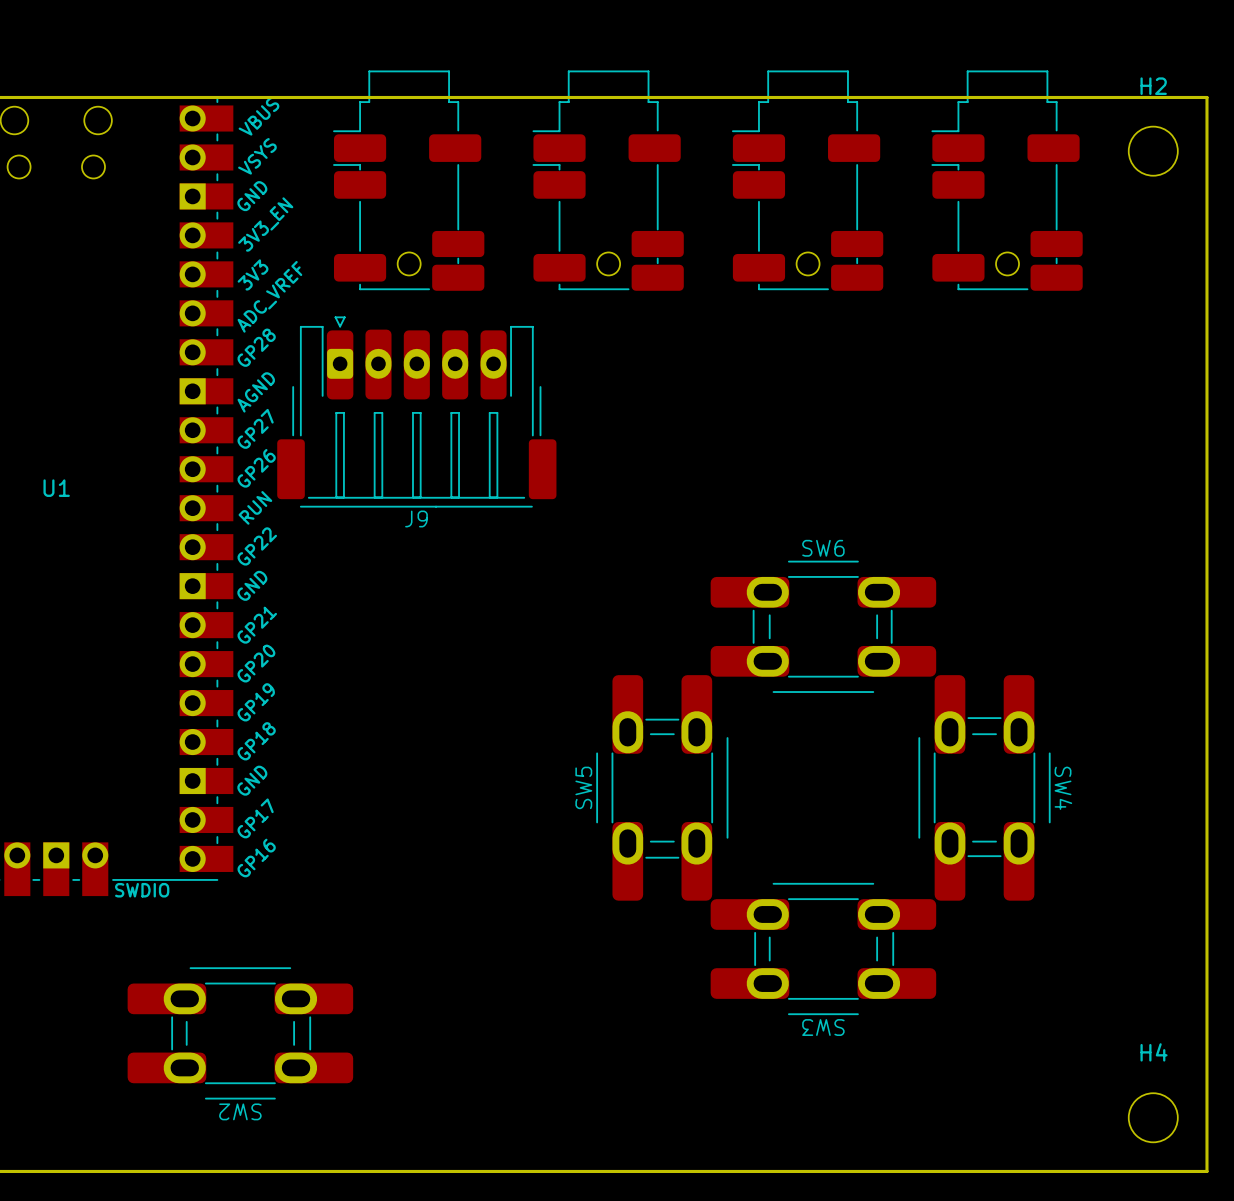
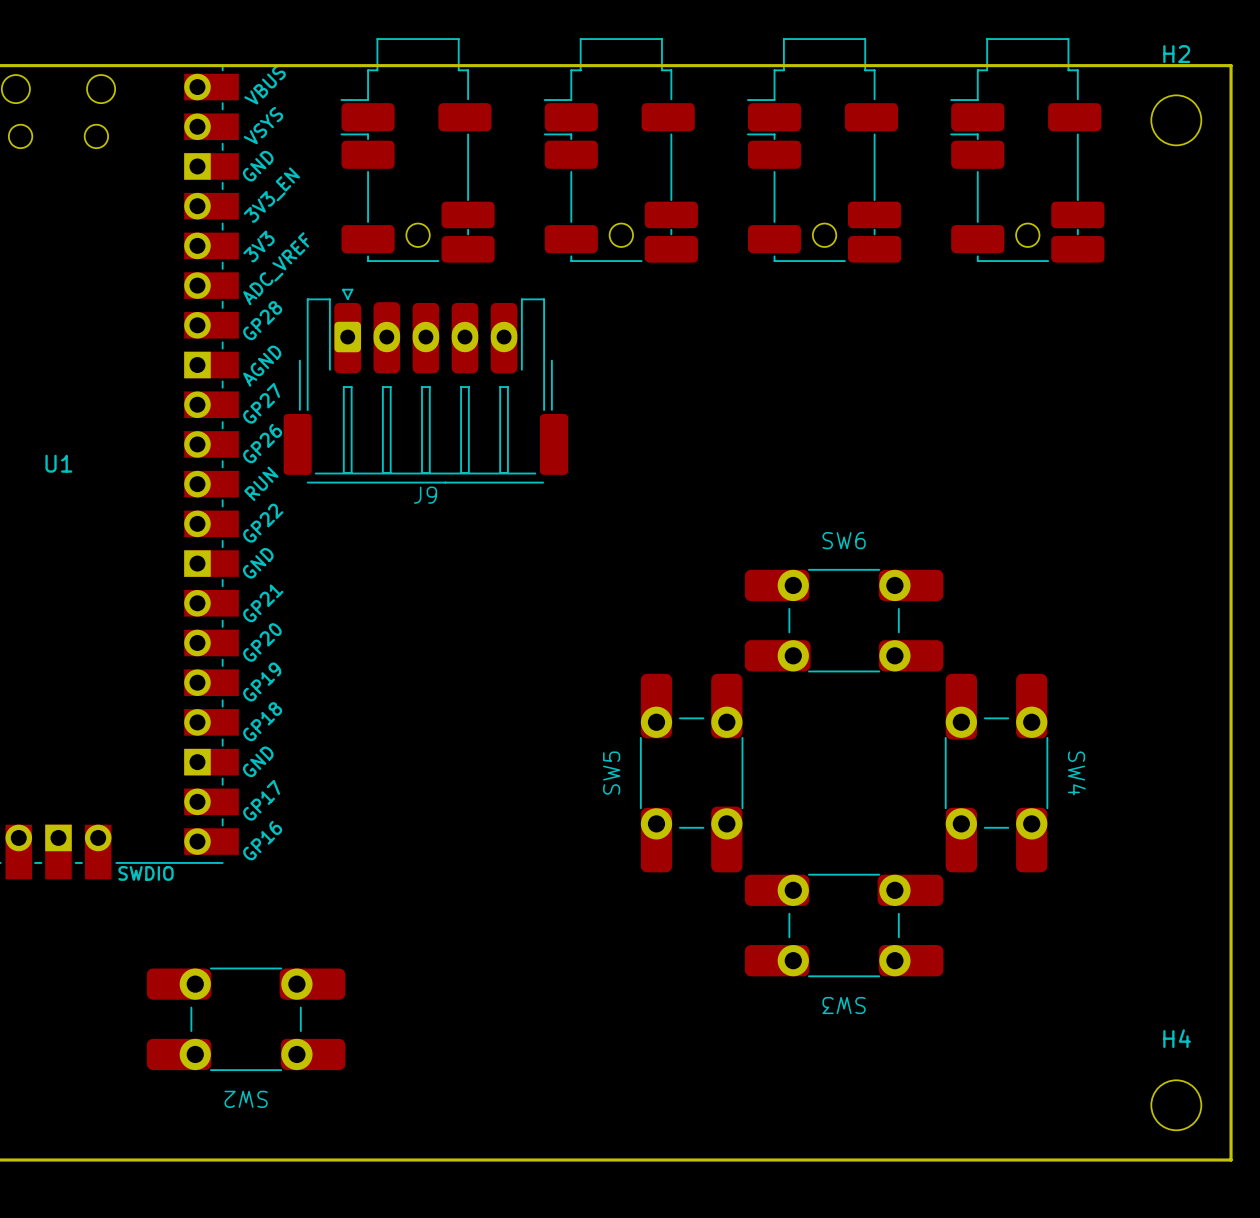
SW6 footprint: [710, 560, 937, 693] -> [744, 568, 944, 673]
SW5 footprint: [596, 675, 729, 901] -> [639, 673, 744, 873]
SW4 footprint: [918, 675, 1051, 901] -> [944, 673, 1049, 873]
SW3 footprint: [710, 882, 937, 1016] -> [744, 873, 944, 978]
SW2 footprint: [127, 967, 354, 1100] -> [146, 967, 346, 1072]

